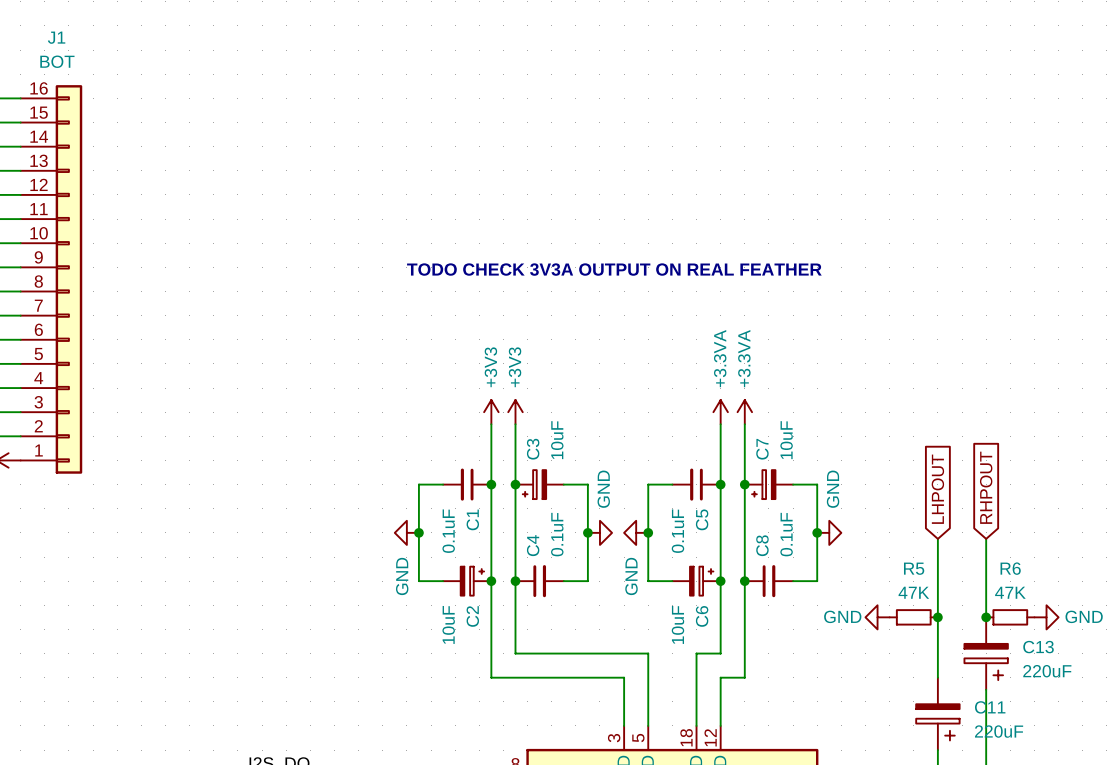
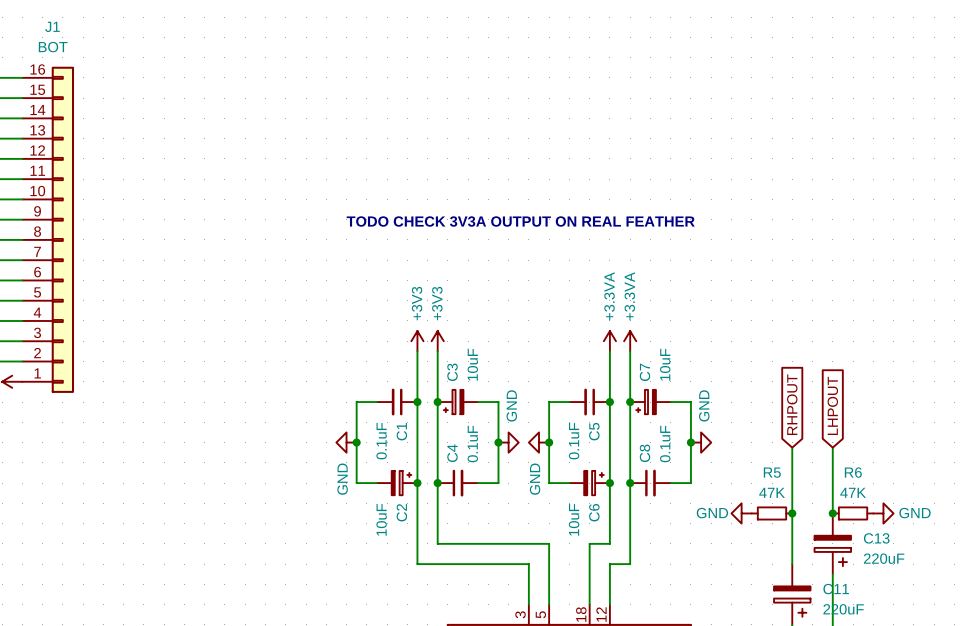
global label: RHPOUT (986, 487) -> LHPOUT (832, 405)
global label: LHPOUT (937, 489) -> RHPOUT (792, 404)

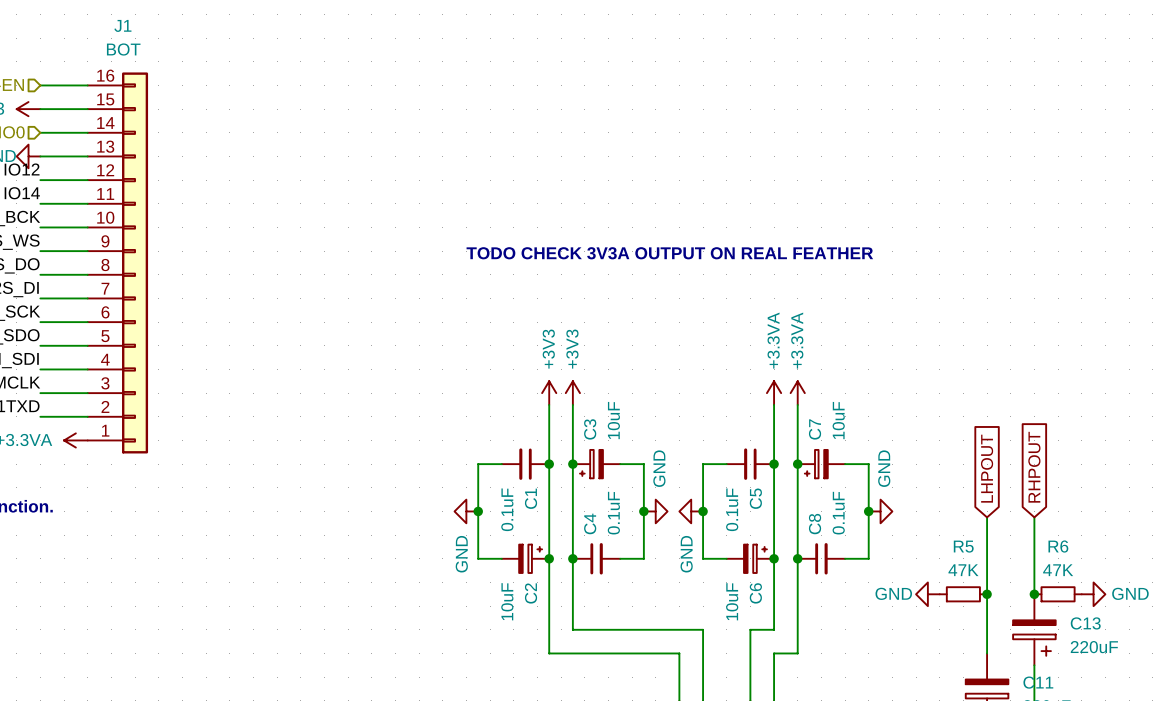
global label: RHPOUT (792, 404) -> LHPOUT (987, 468)
global label: LHPOUT (832, 405) -> RHPOUT (1034, 467)

